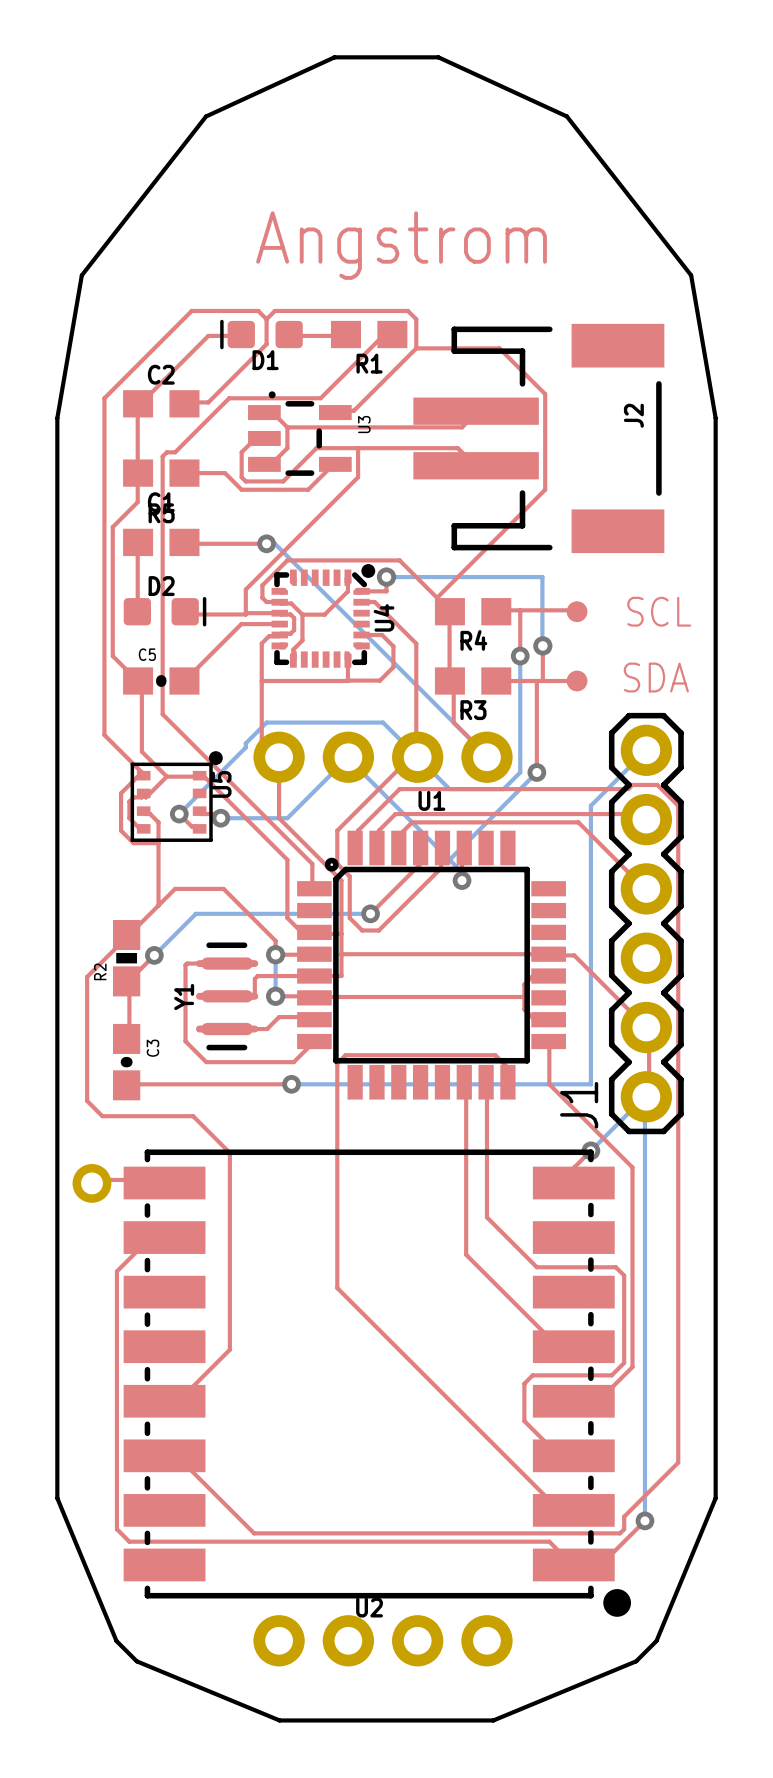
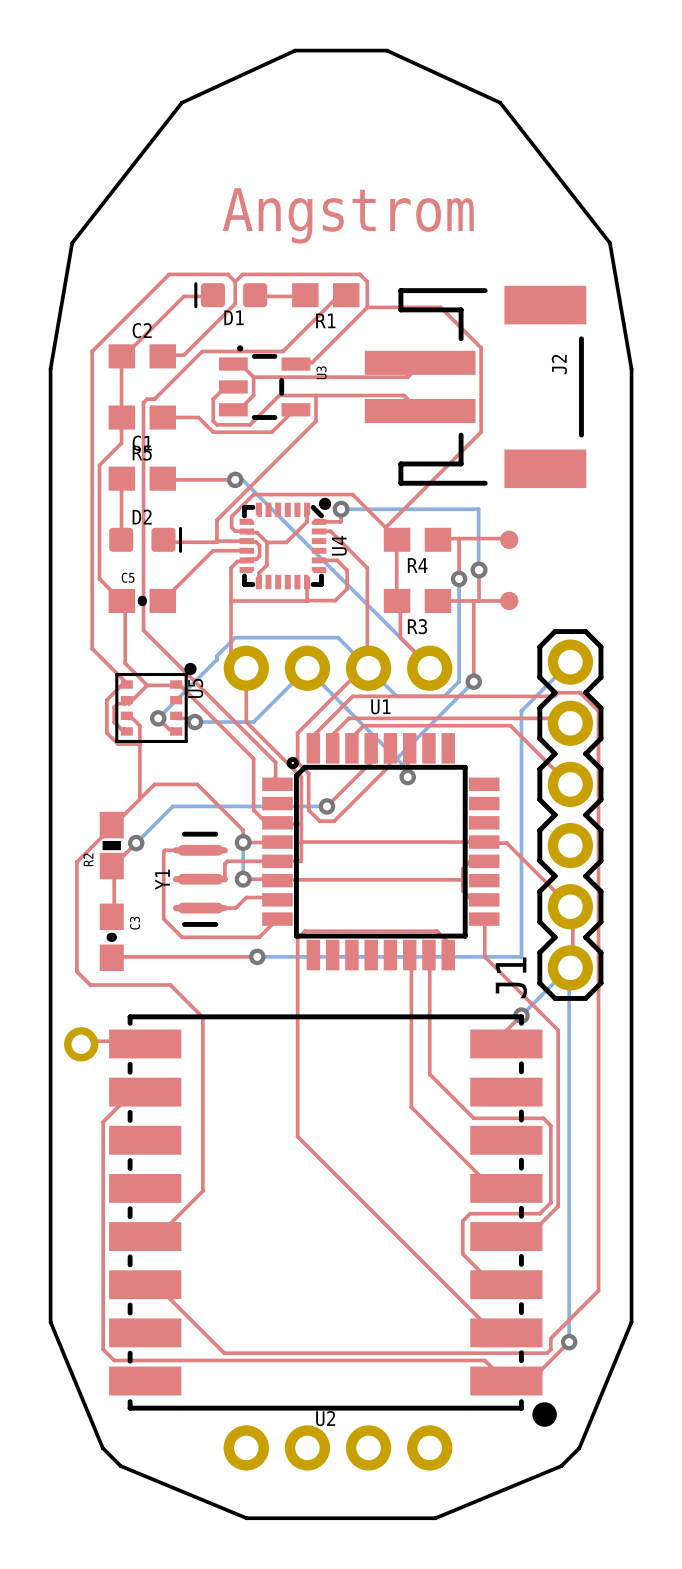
text: SCL (659, 611) -> none
text: SDA (656, 677) -> none

